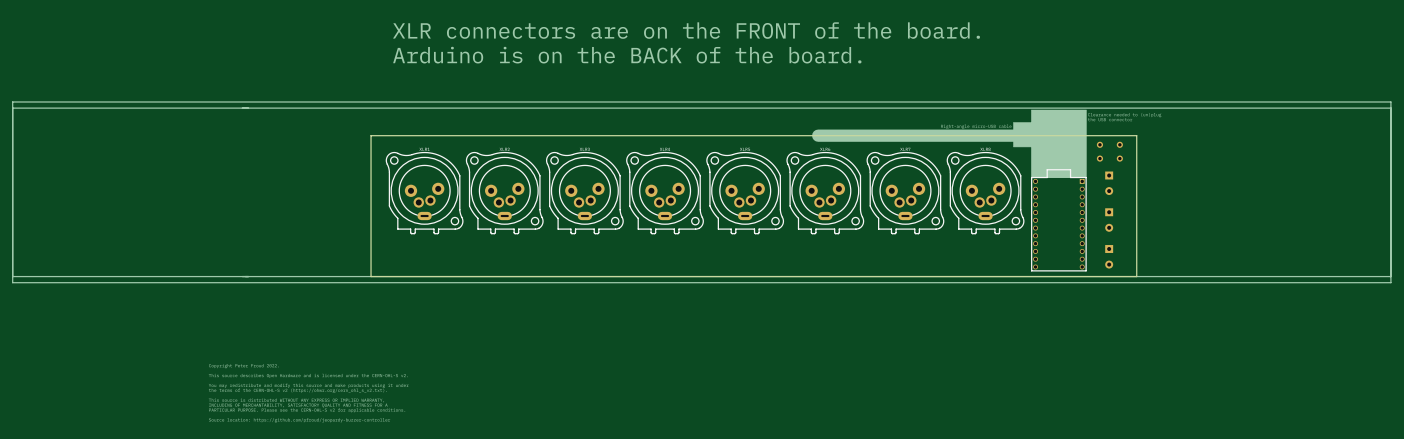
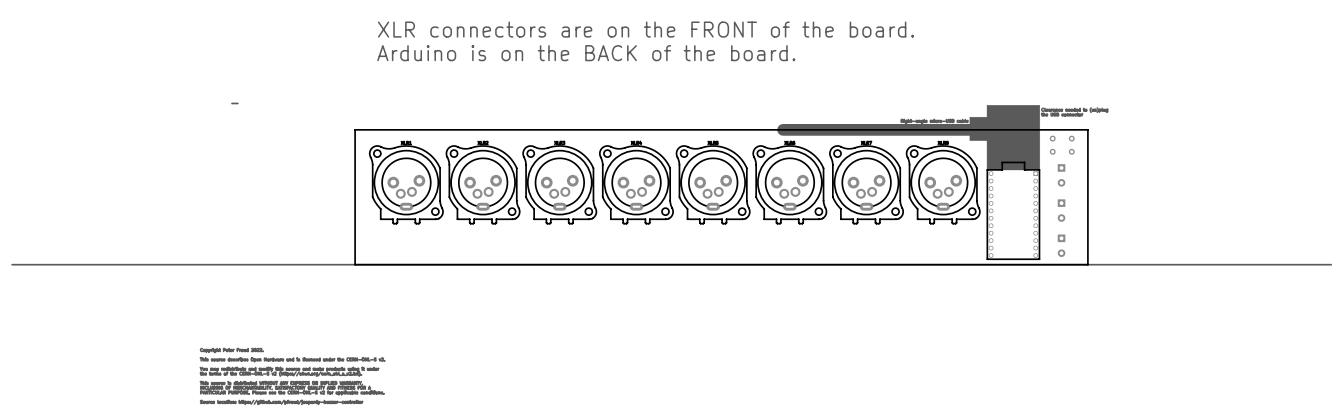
line: (12, 101) (12, 282) (1390, 282) (1390, 101) (12, 101) -> none
line: (12, 108) (1390, 108) -> none

